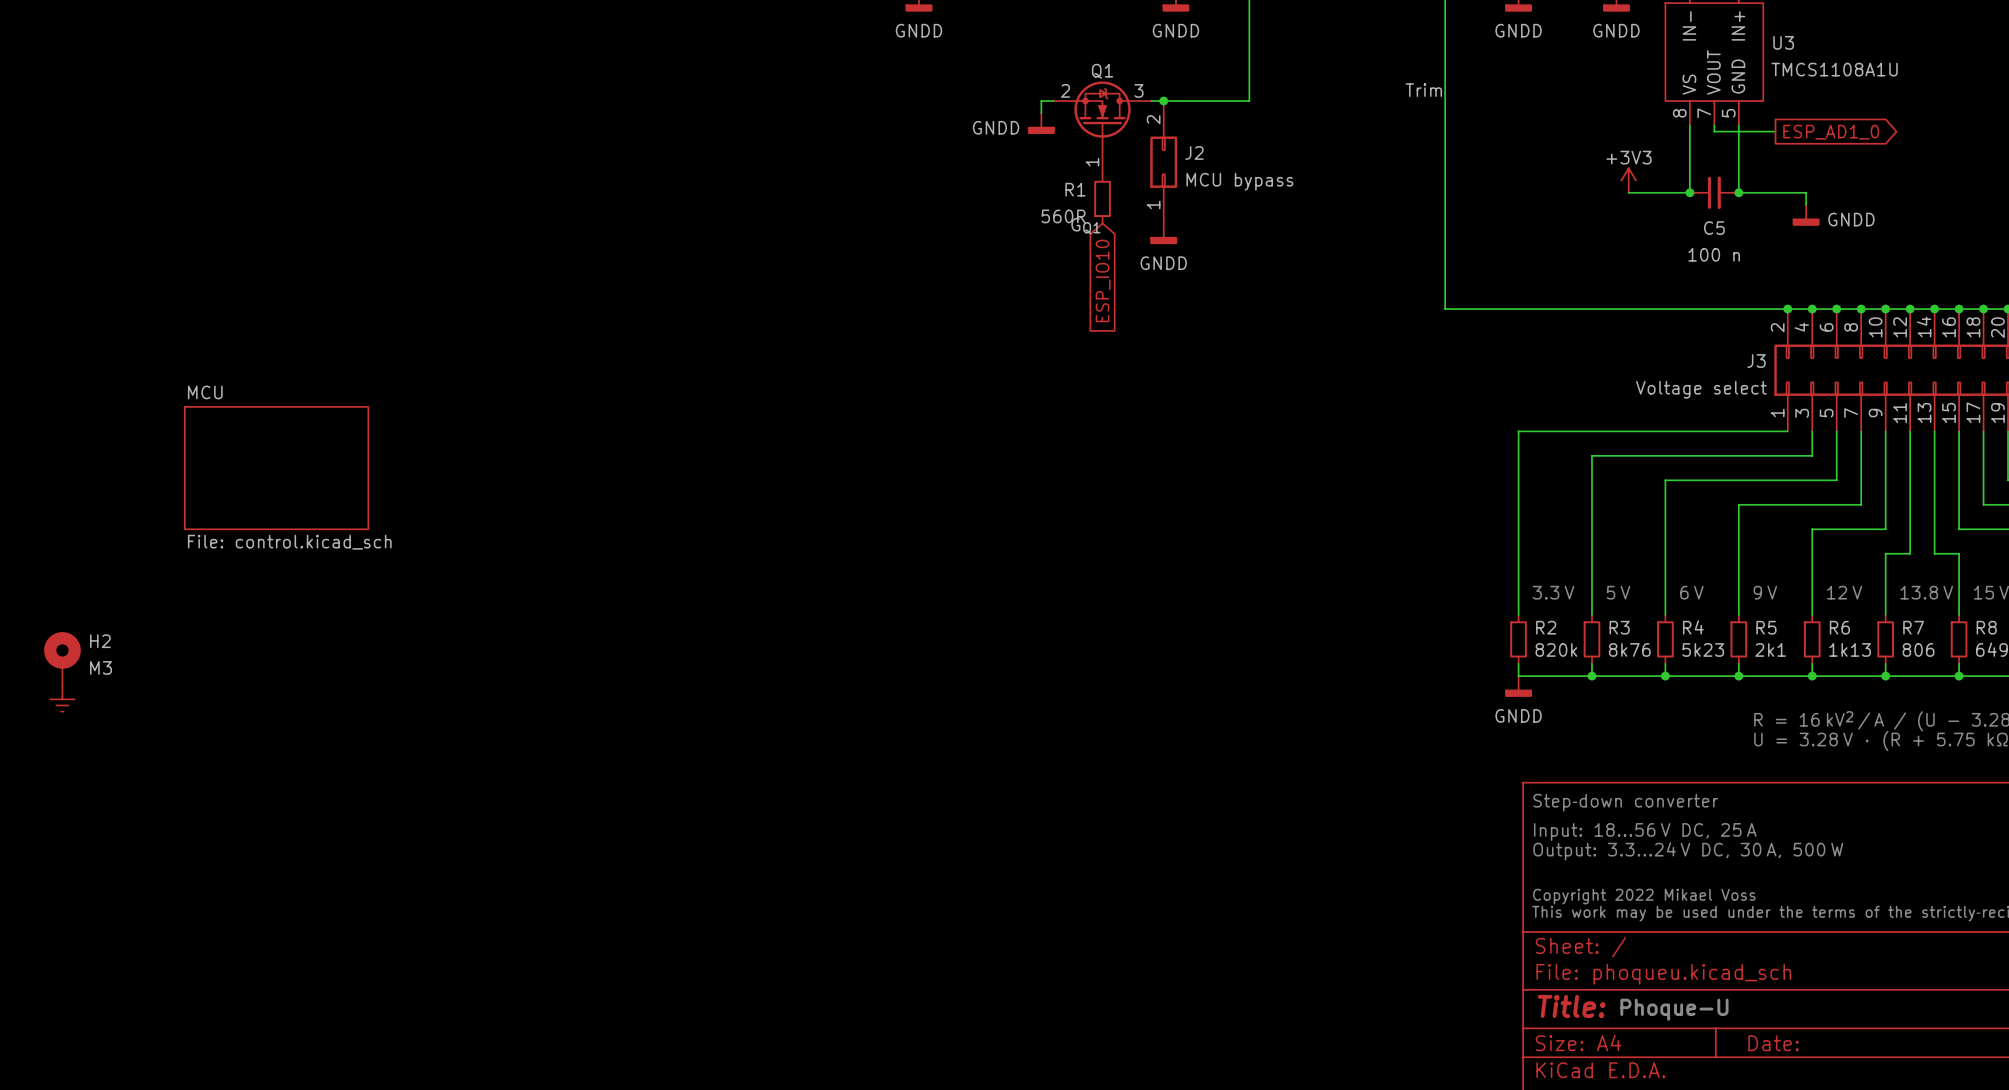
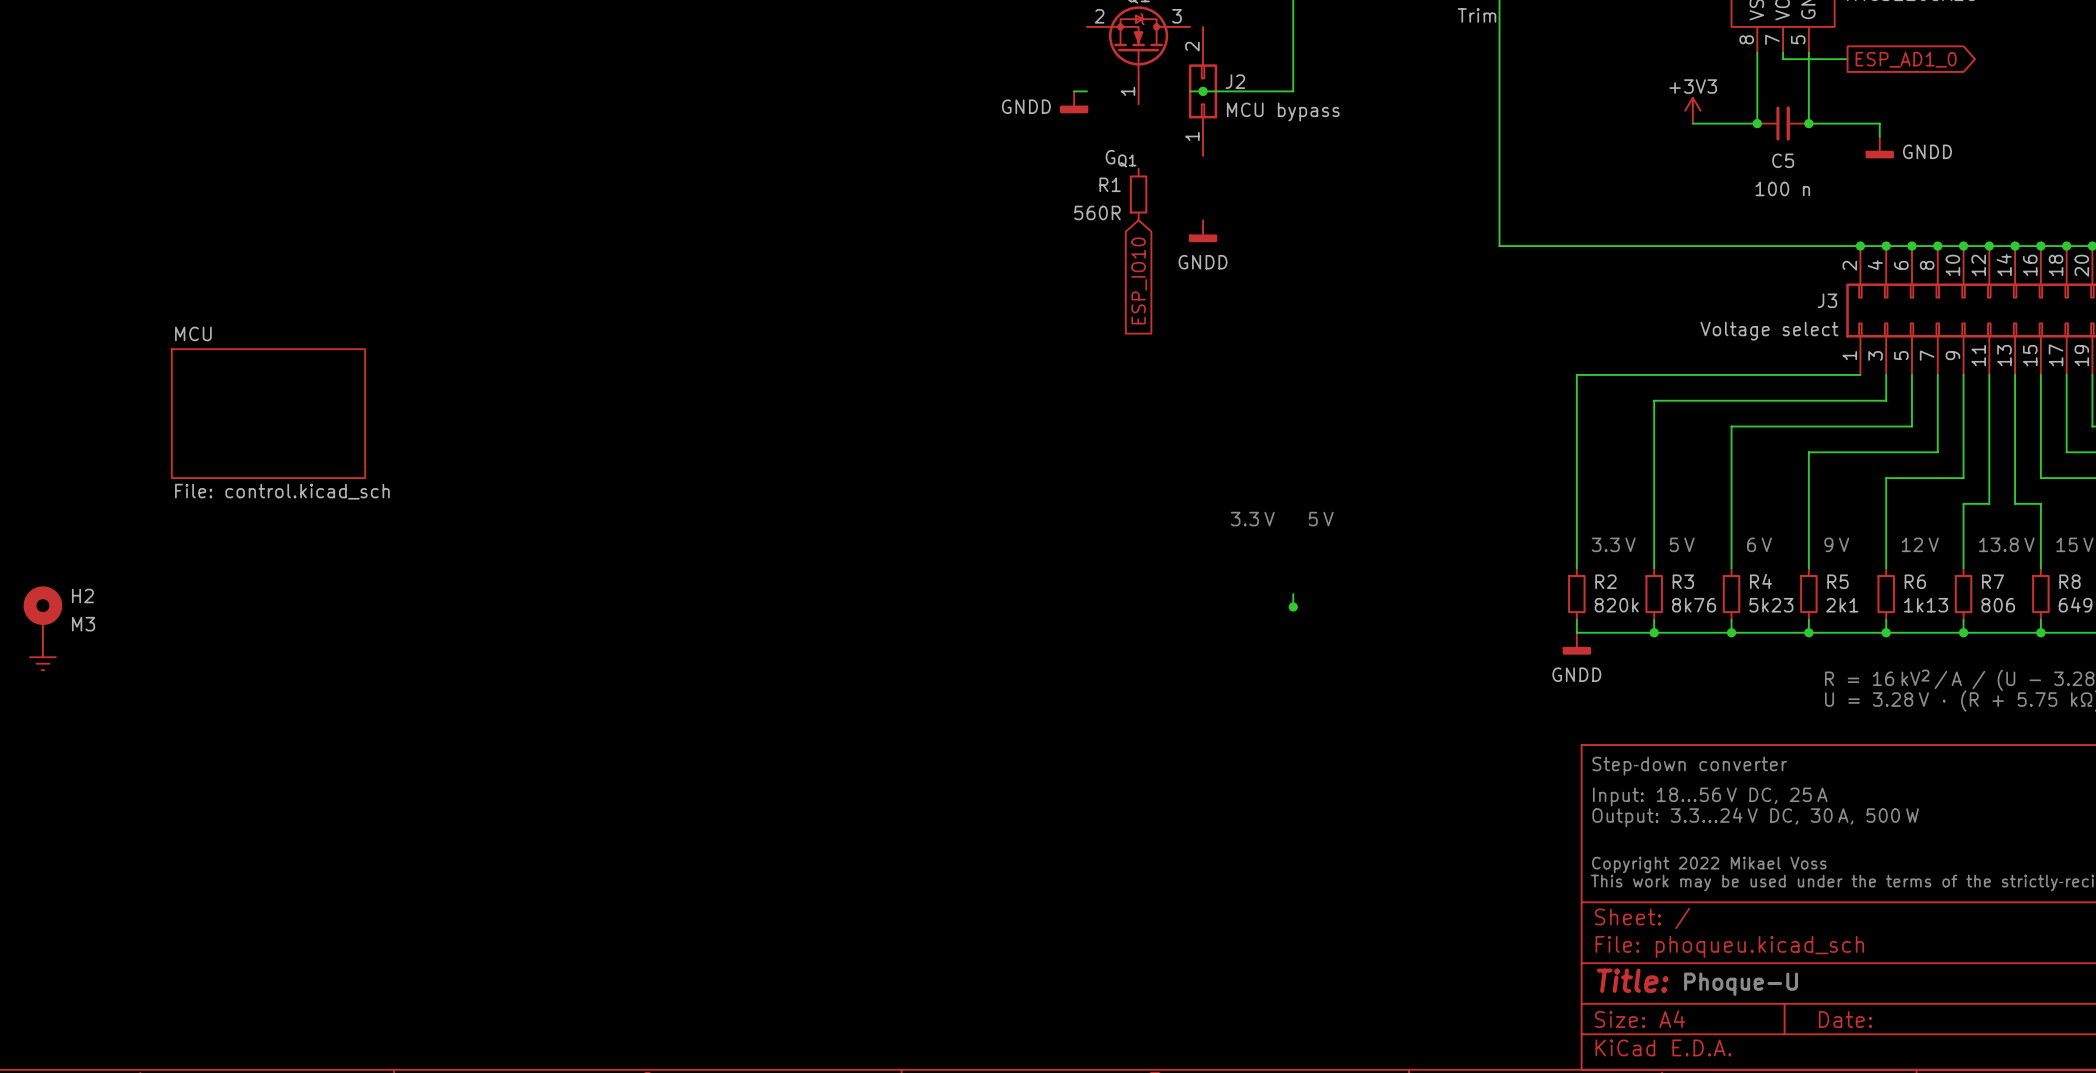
wire: (1053, 101) (1041, 101) (1041, 113) -> none
wire: (1151, 101) (1249, 101) -> (1190, 91) (1293, 91) (1293, 26)
junction: (1163, 101) -> none
power symbol position: GNDD (1041, 123) -> GNDD (1074, 102)
wire: none -> (1074, 91) (1087, 91)
junction: none -> (1203, 91)
R1 position: (1102, 198) -> (1138, 194)
power symbol position: GNDD (1163, 233) -> GNDD (1203, 231)
global label position: ESP_IO10 (1103, 280) -> ESP_IO10 (1139, 280)
text: none -> 3.3 V (1252, 519)
text: none -> 5 V (1321, 519)
wire: none -> (1293, 594) (1293, 606)
junction: none -> (1293, 606)

